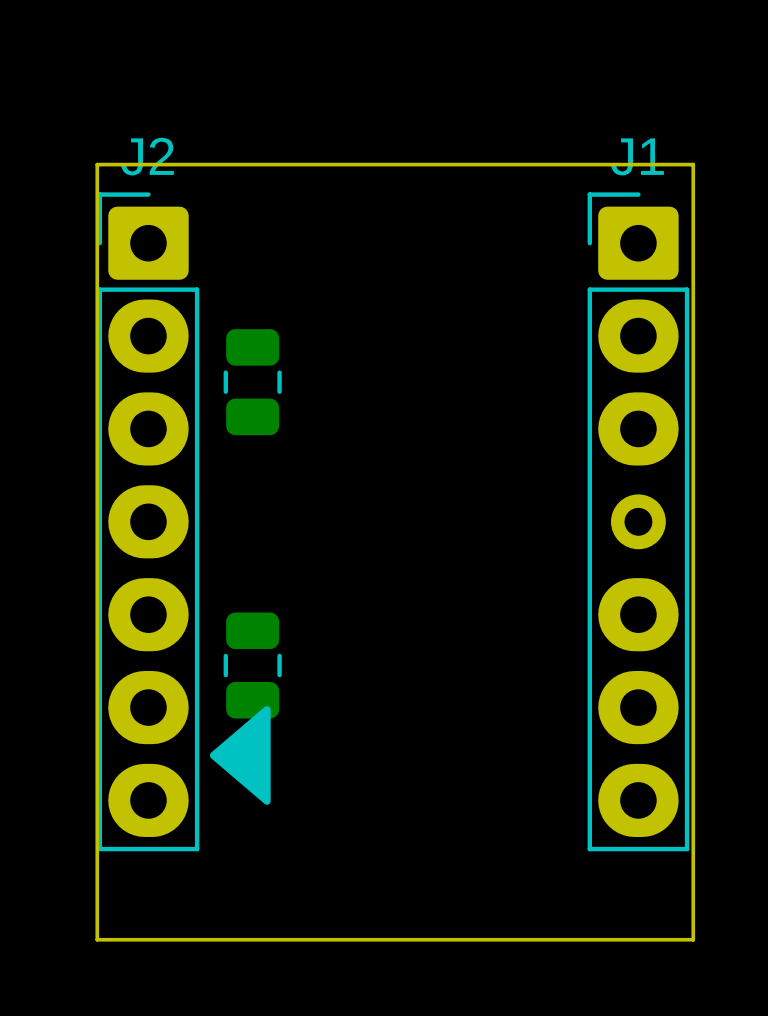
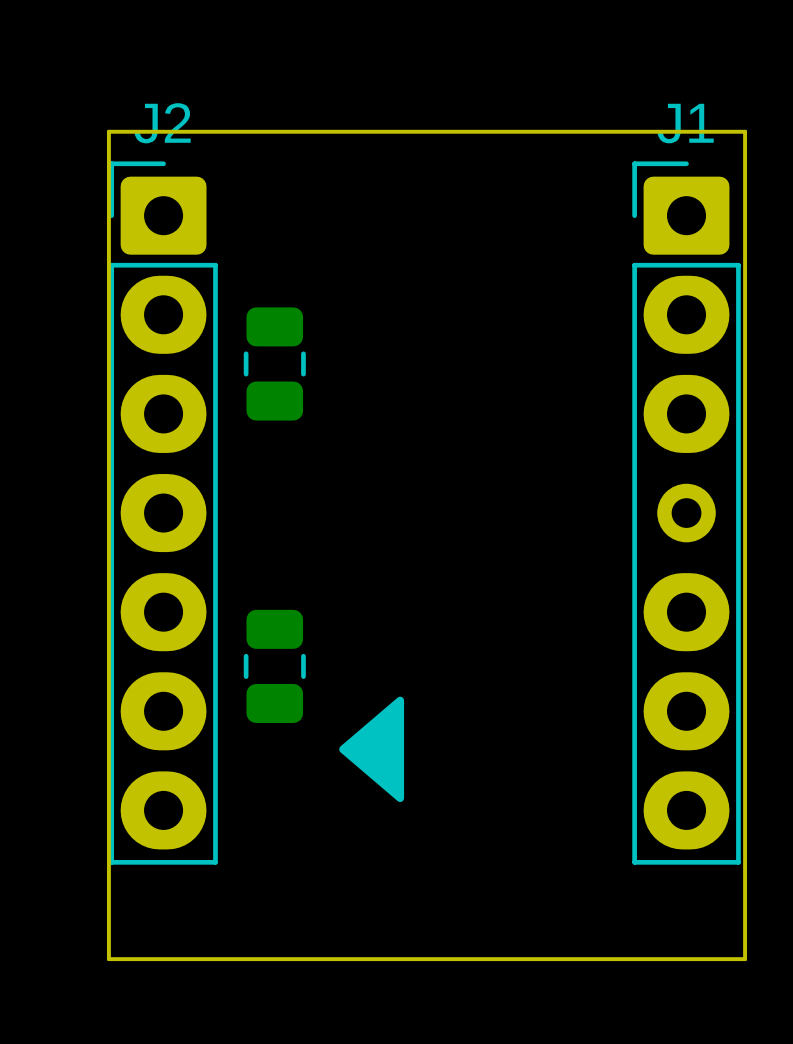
drawing position: (240, 755) -> (371, 749)

